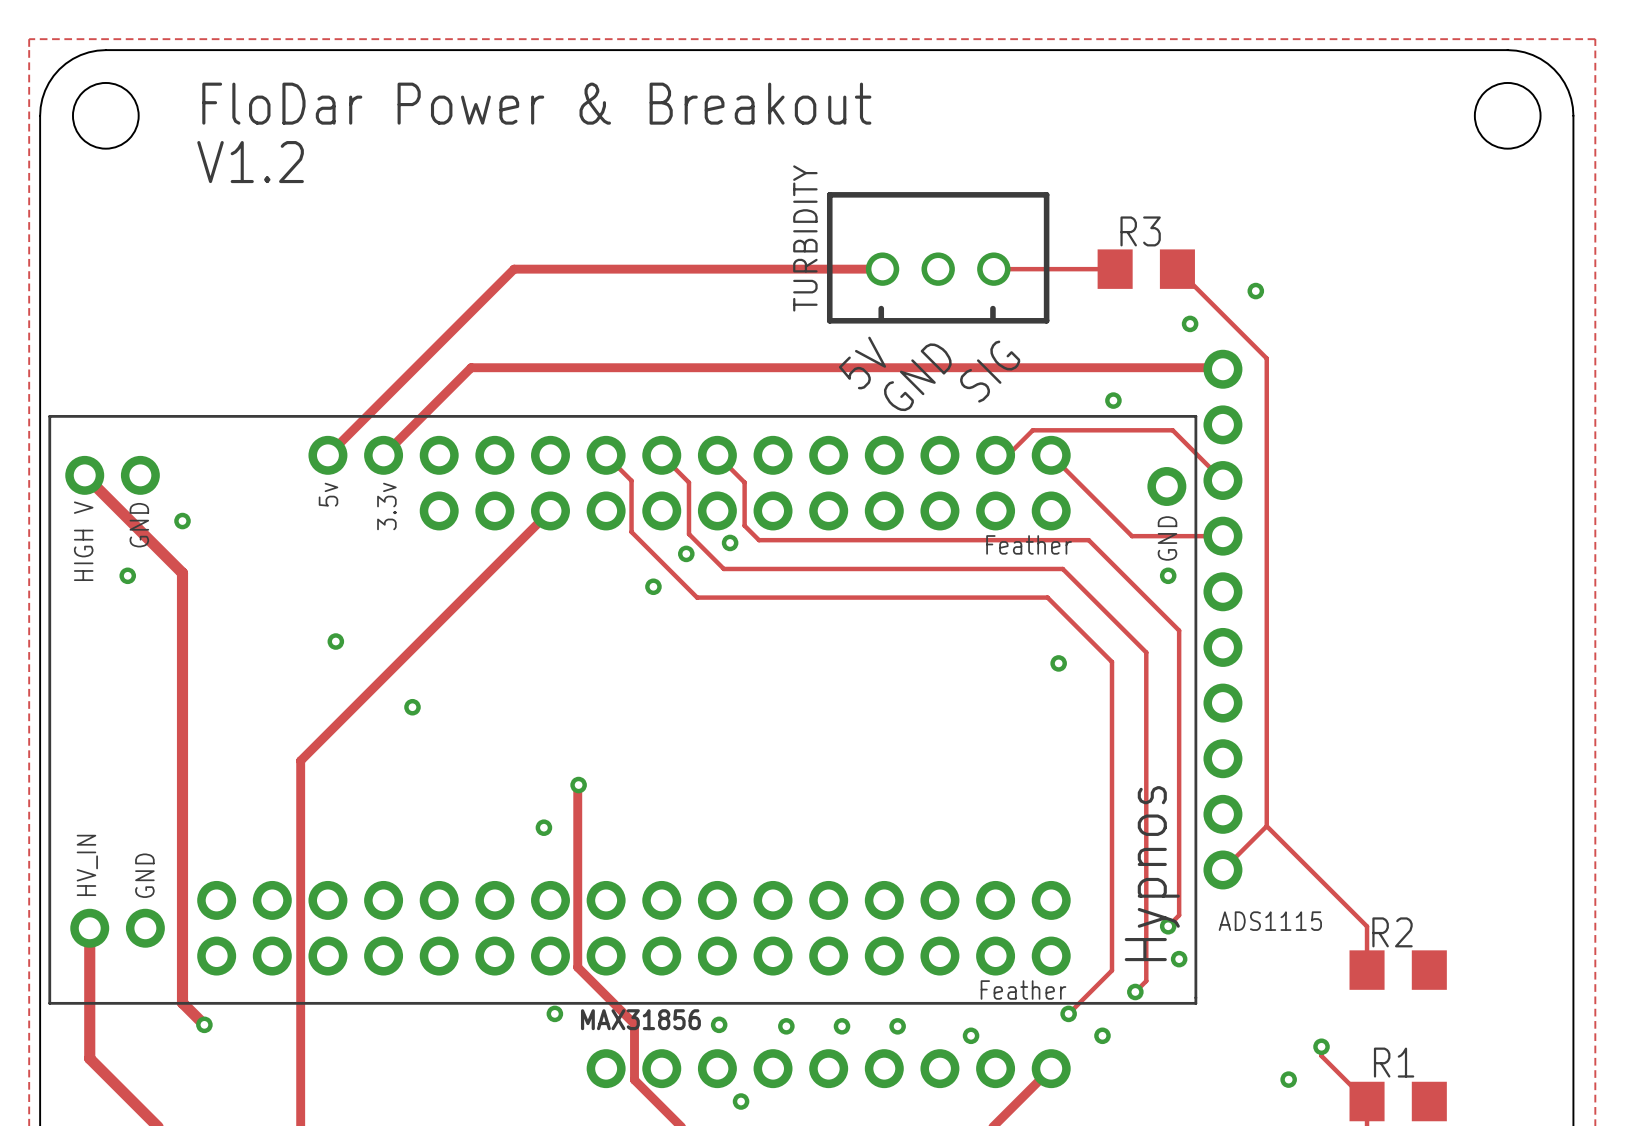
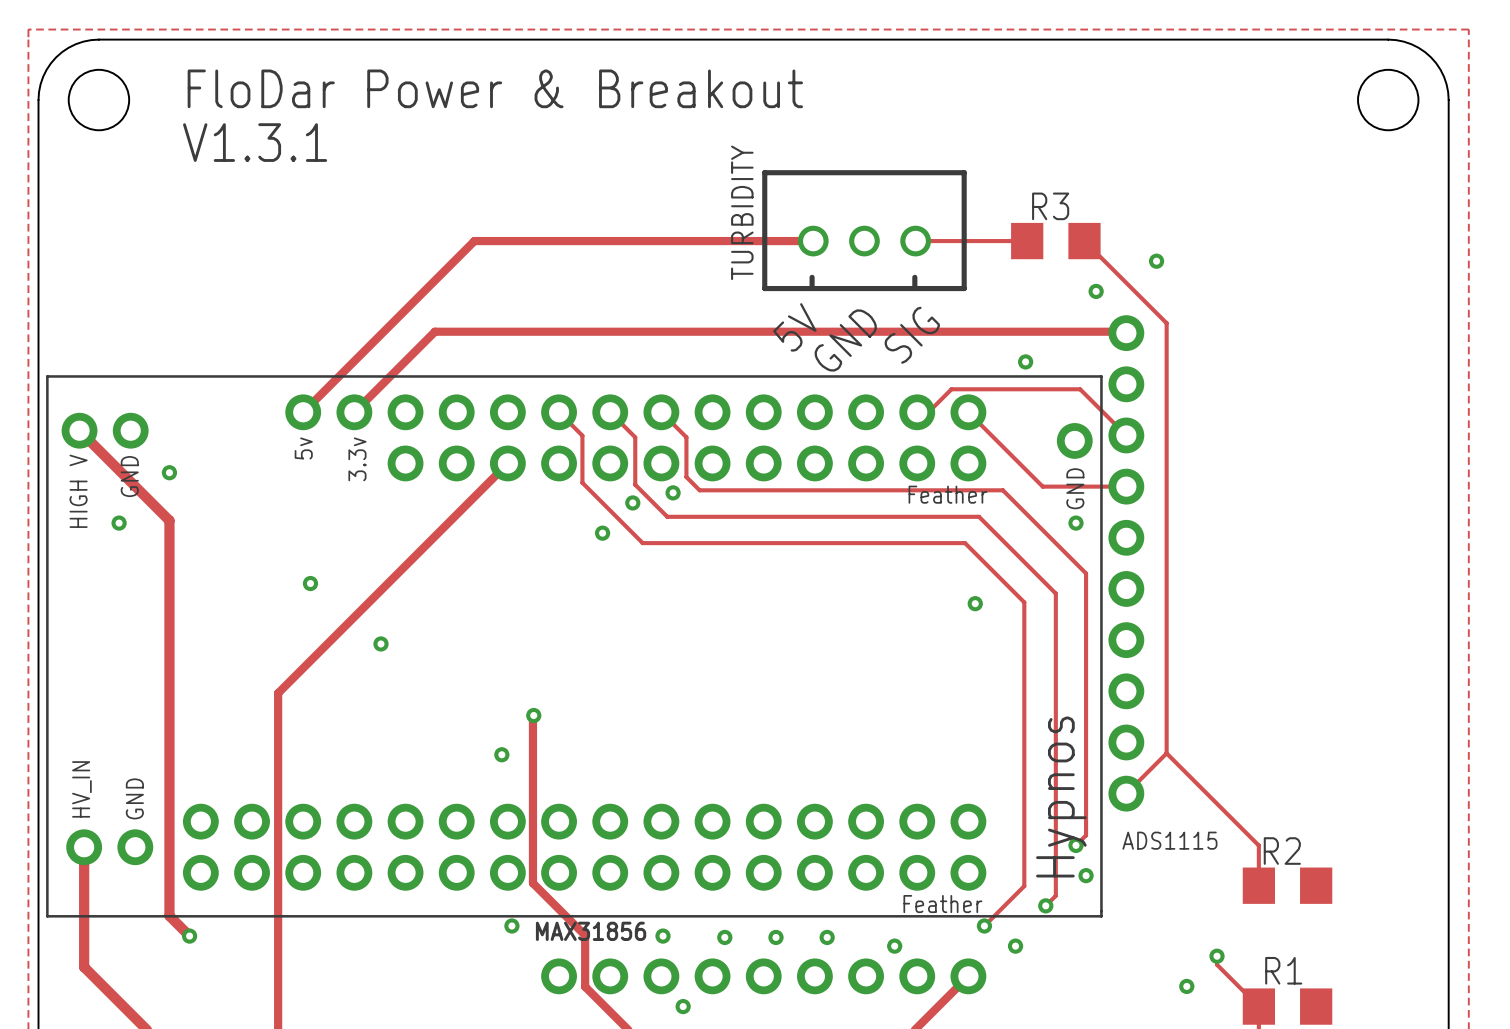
text: V1.2 (250, 162) -> V1.3.1 (255, 142)

